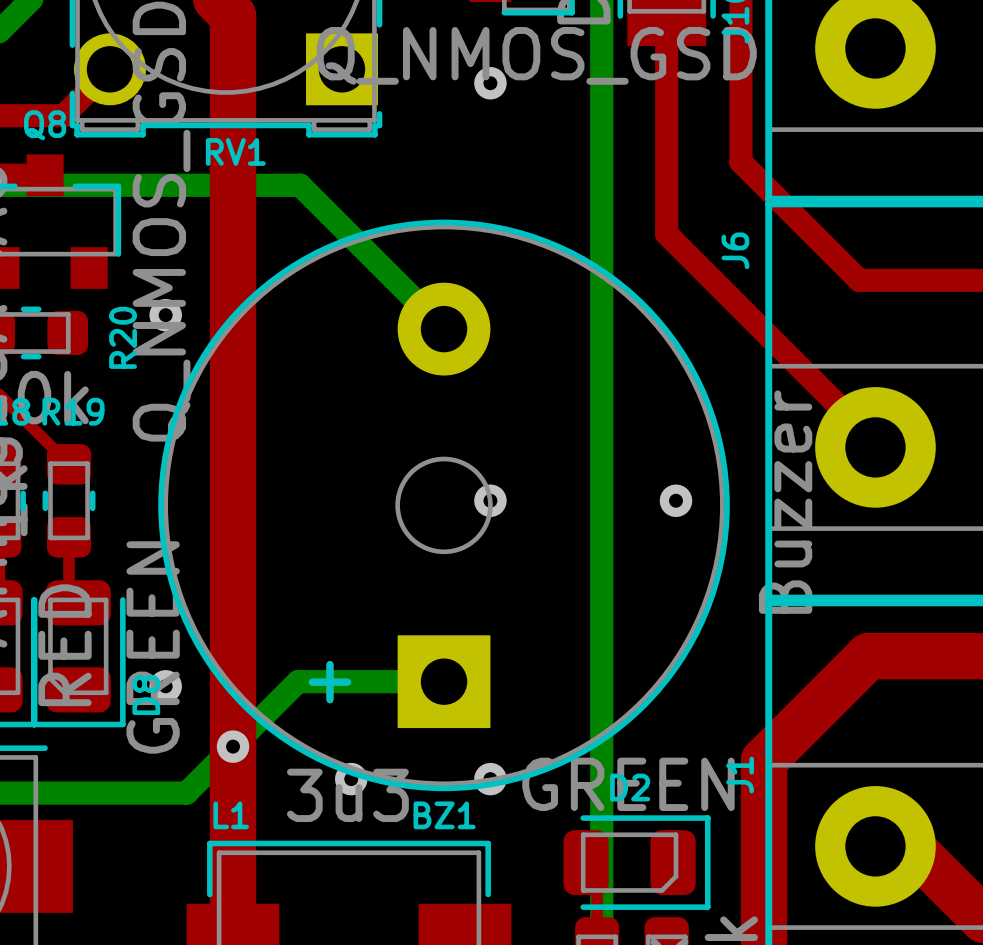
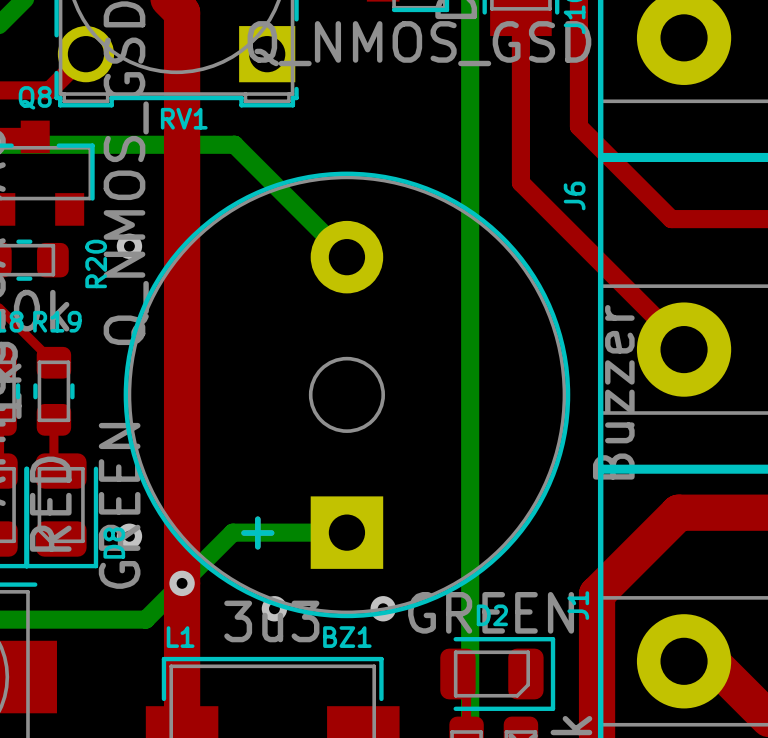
via: (490, 83) -> none
via: (490, 500) -> none
via: (675, 500) -> none

